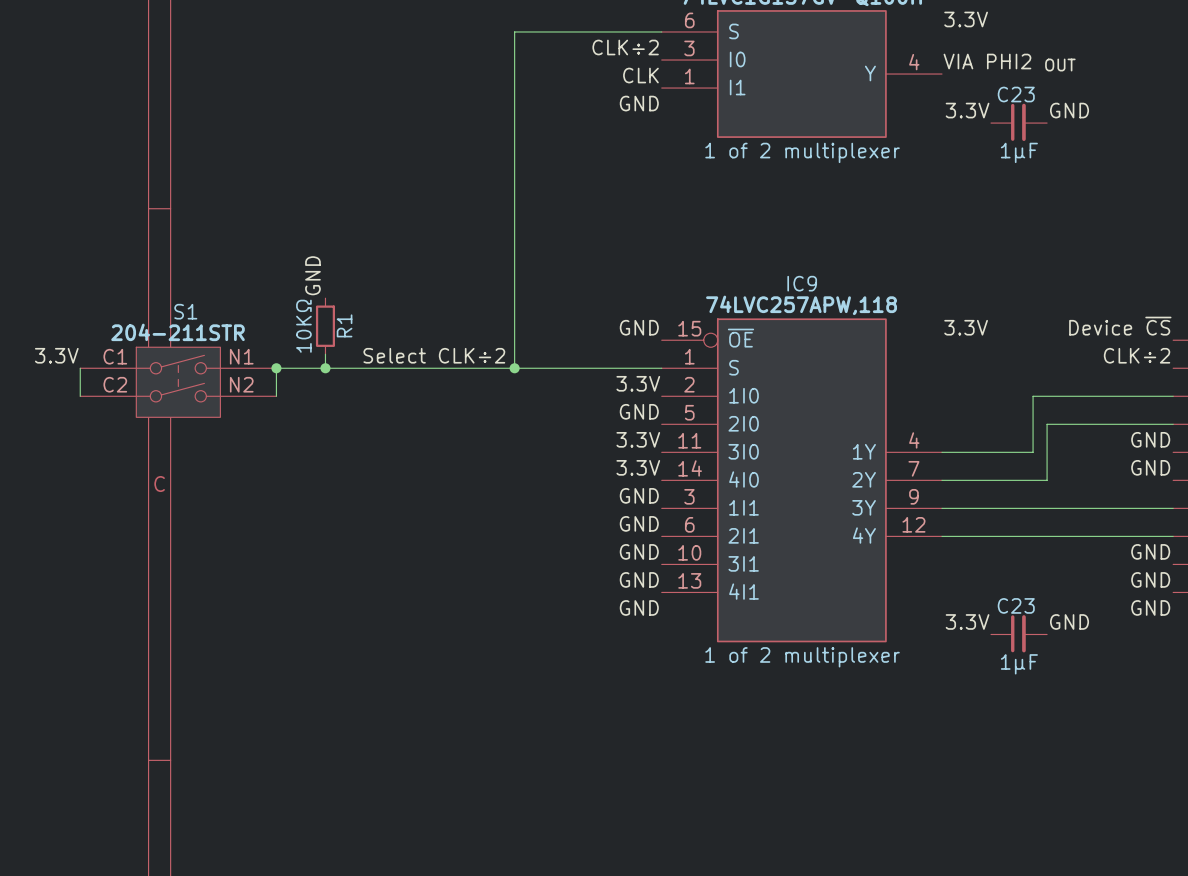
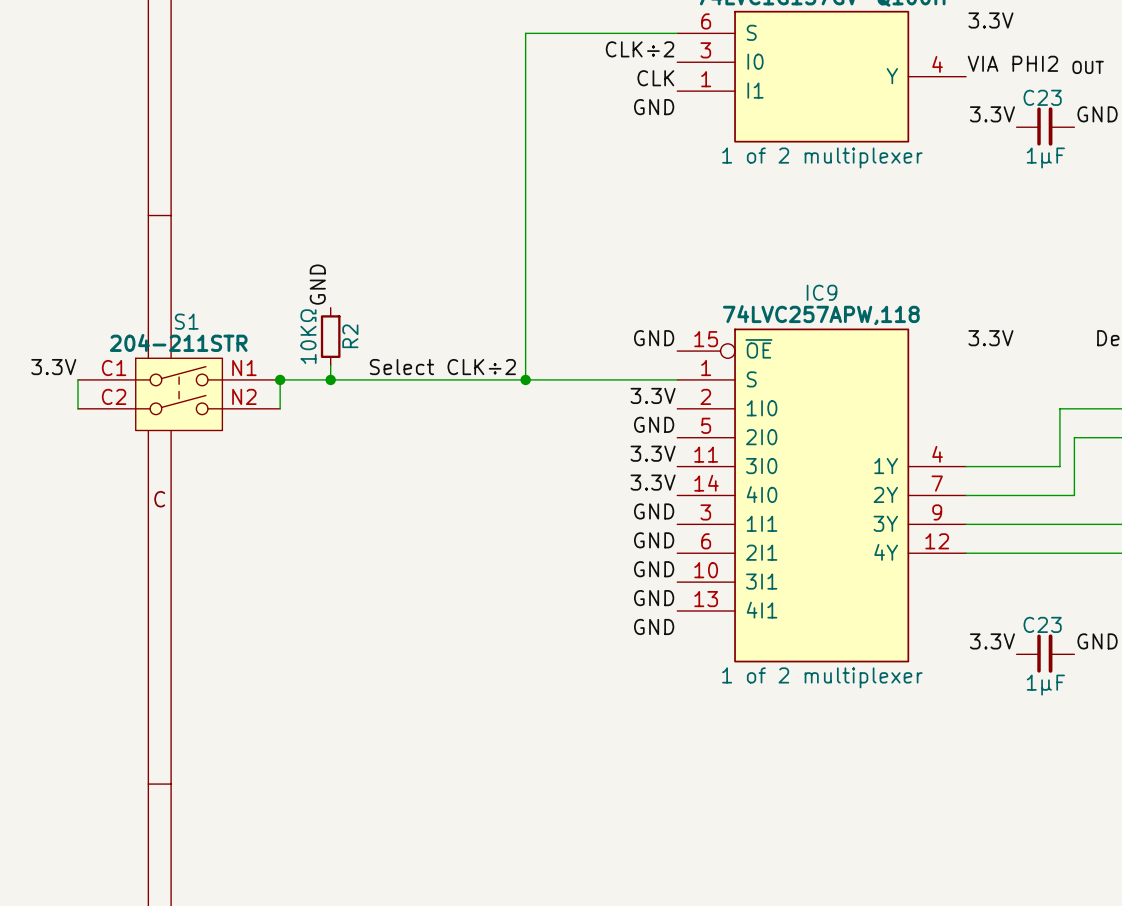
R1 name: R1 (344, 325) -> R2 (350, 336)

